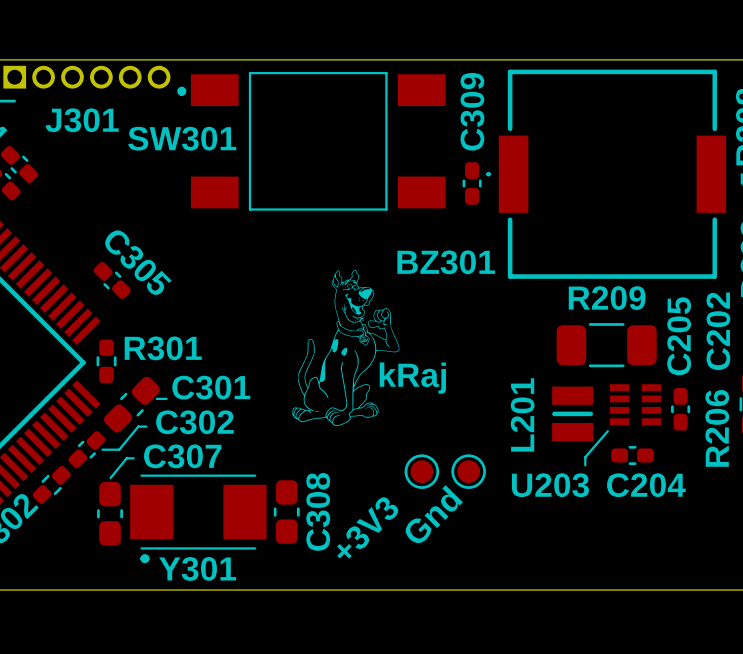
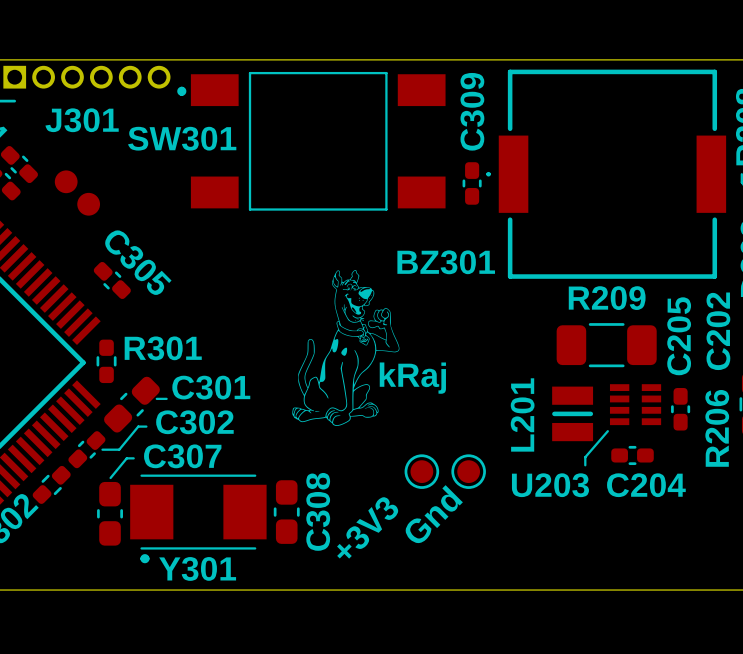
part: none -> (66, 181)
part: none -> (88, 204)

